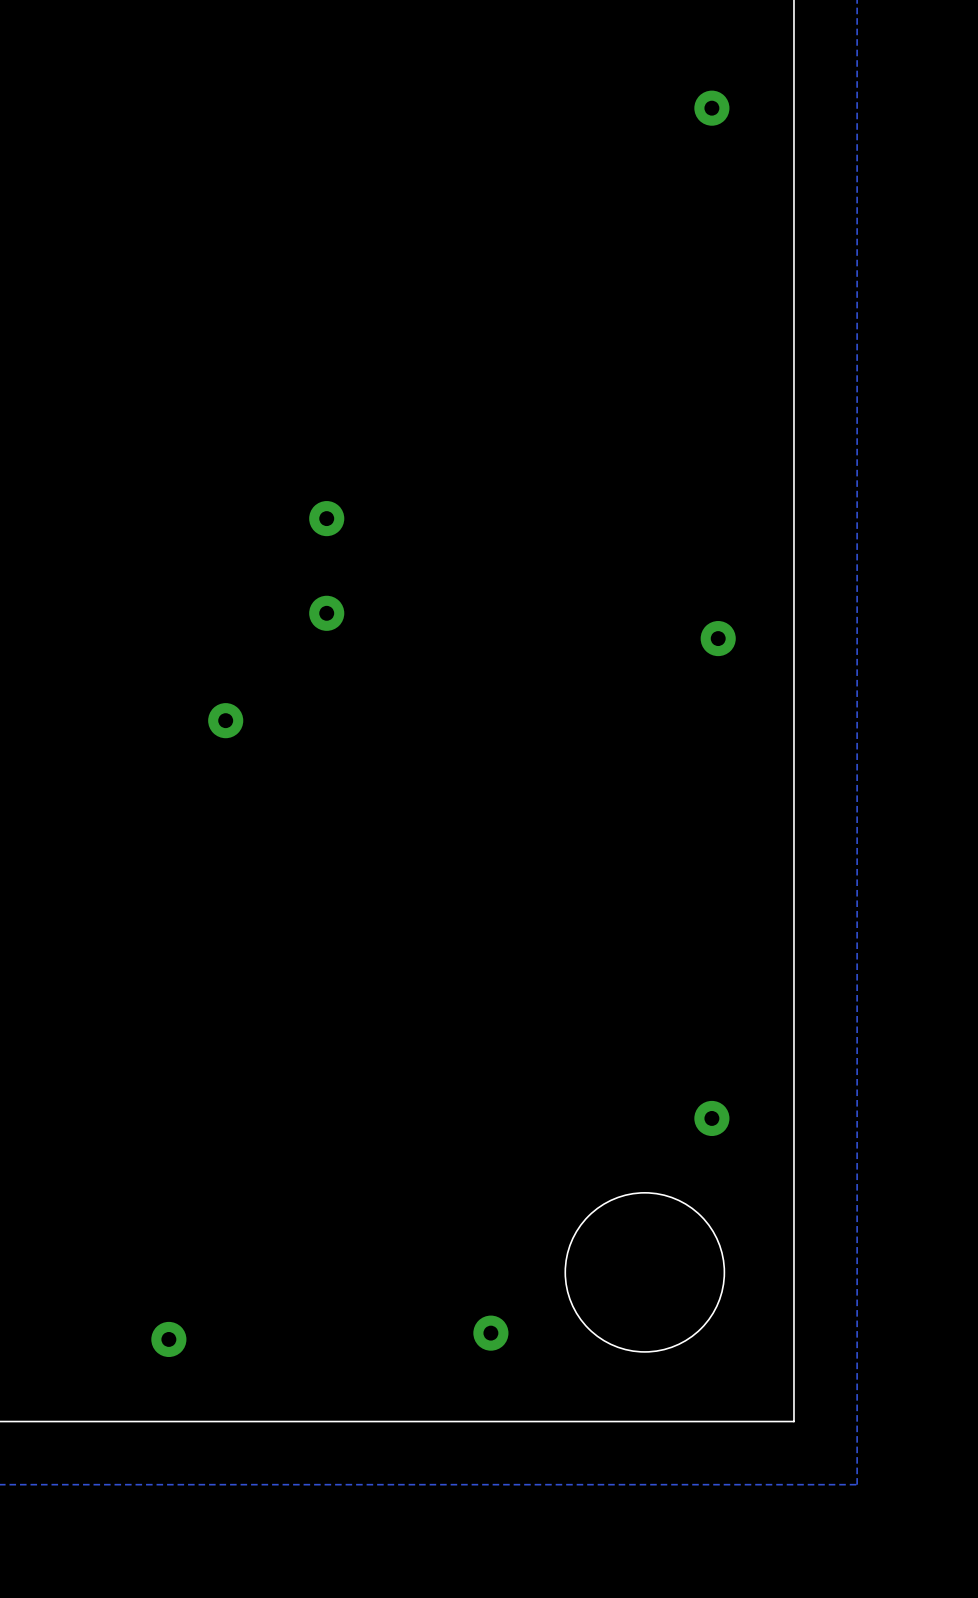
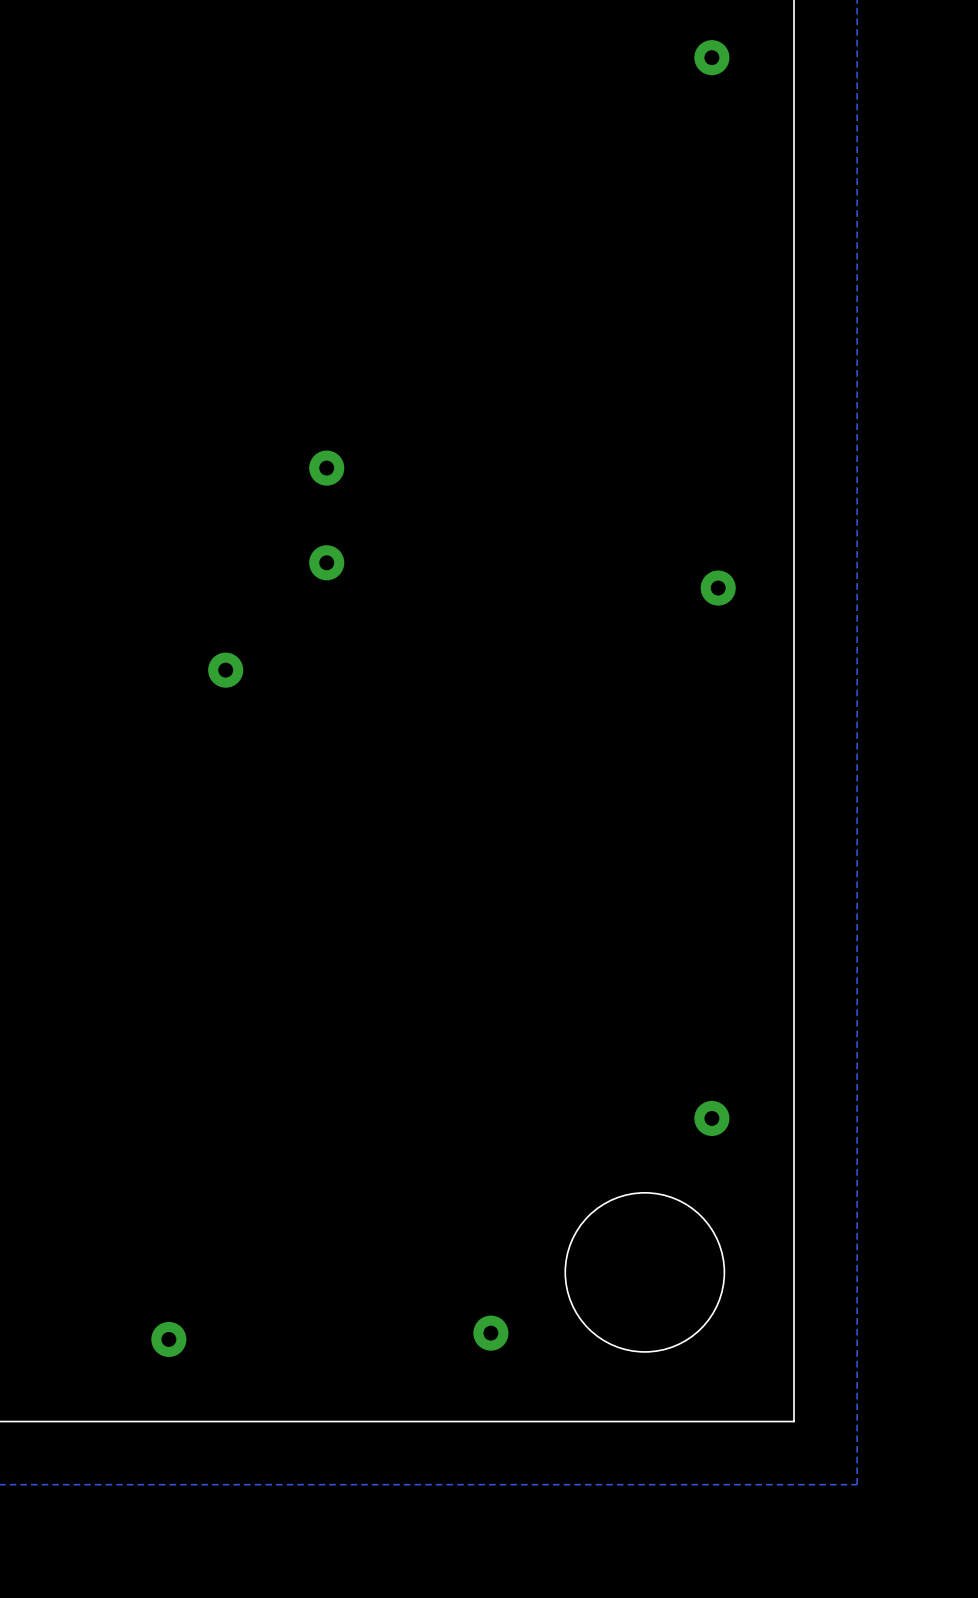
via position: (711, 108) -> (711, 57)
via: none -> (326, 468)
via: (326, 518) -> none
via: none -> (326, 562)
via: (326, 613) -> none
via position: (718, 638) -> (718, 588)
via position: (225, 720) -> (225, 670)

